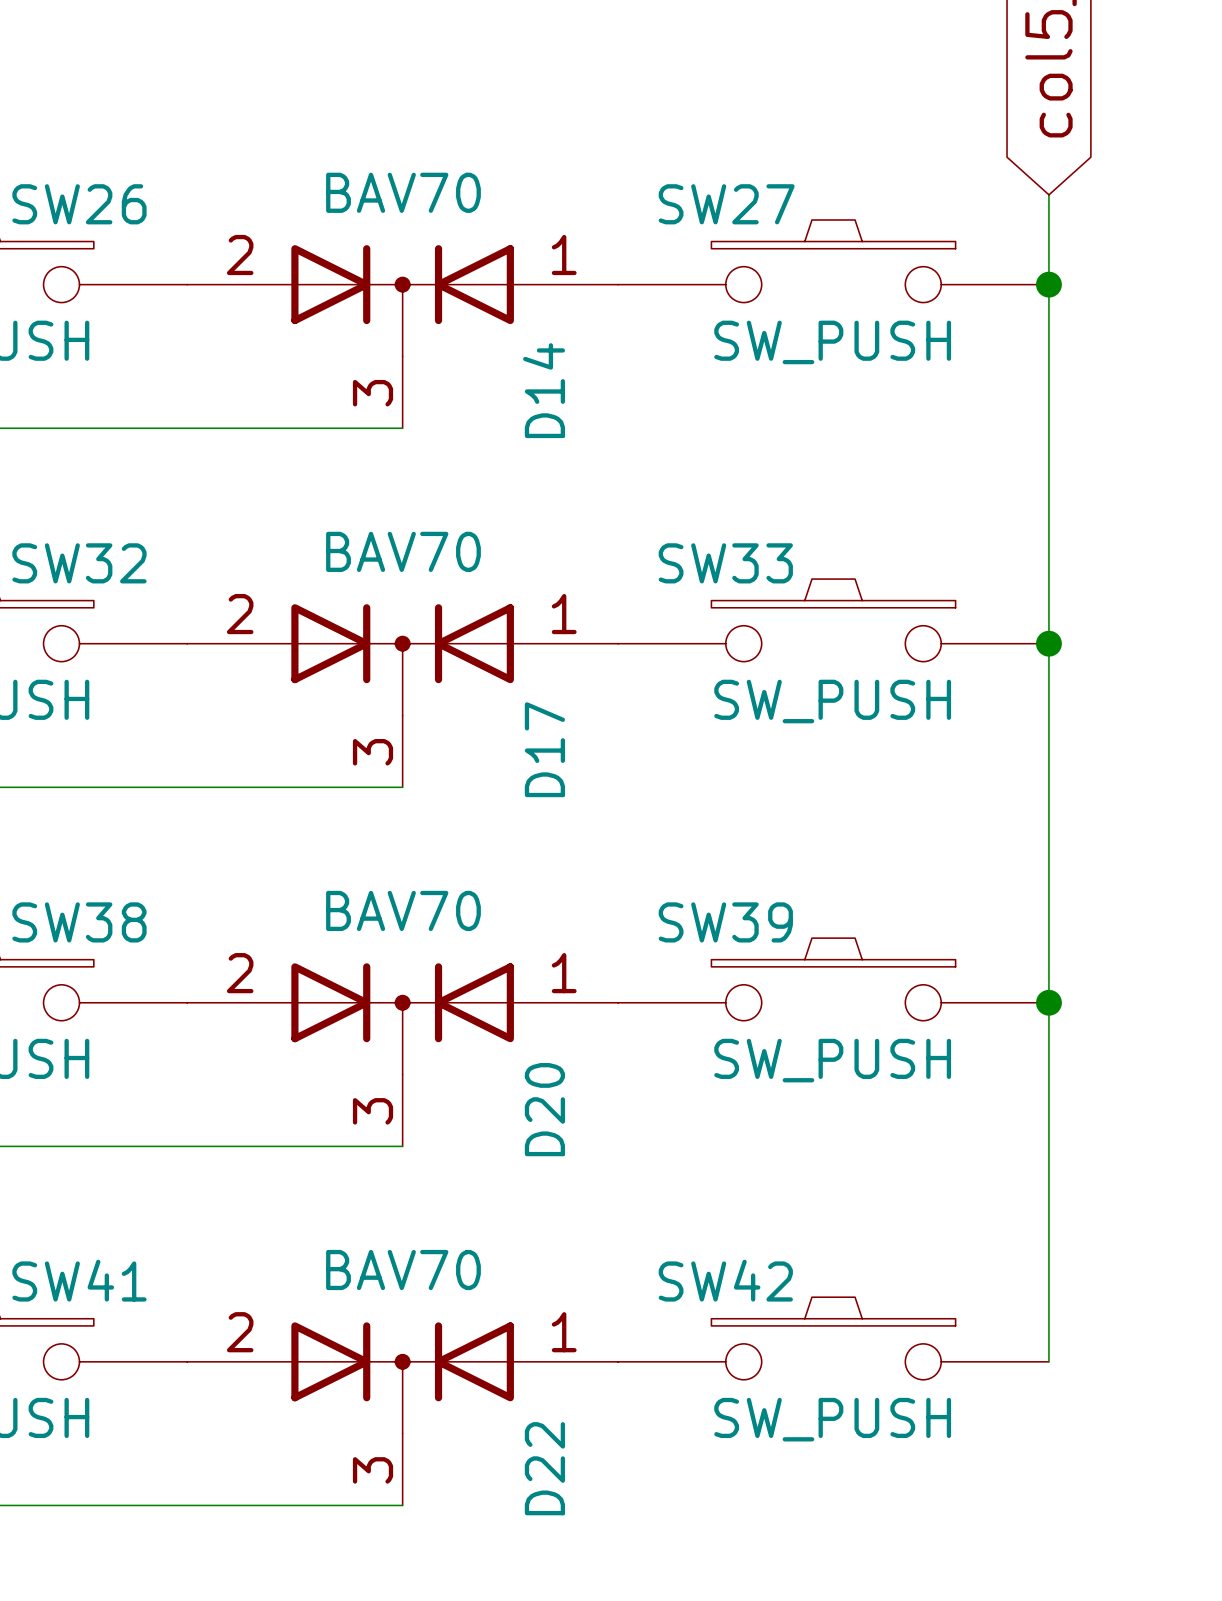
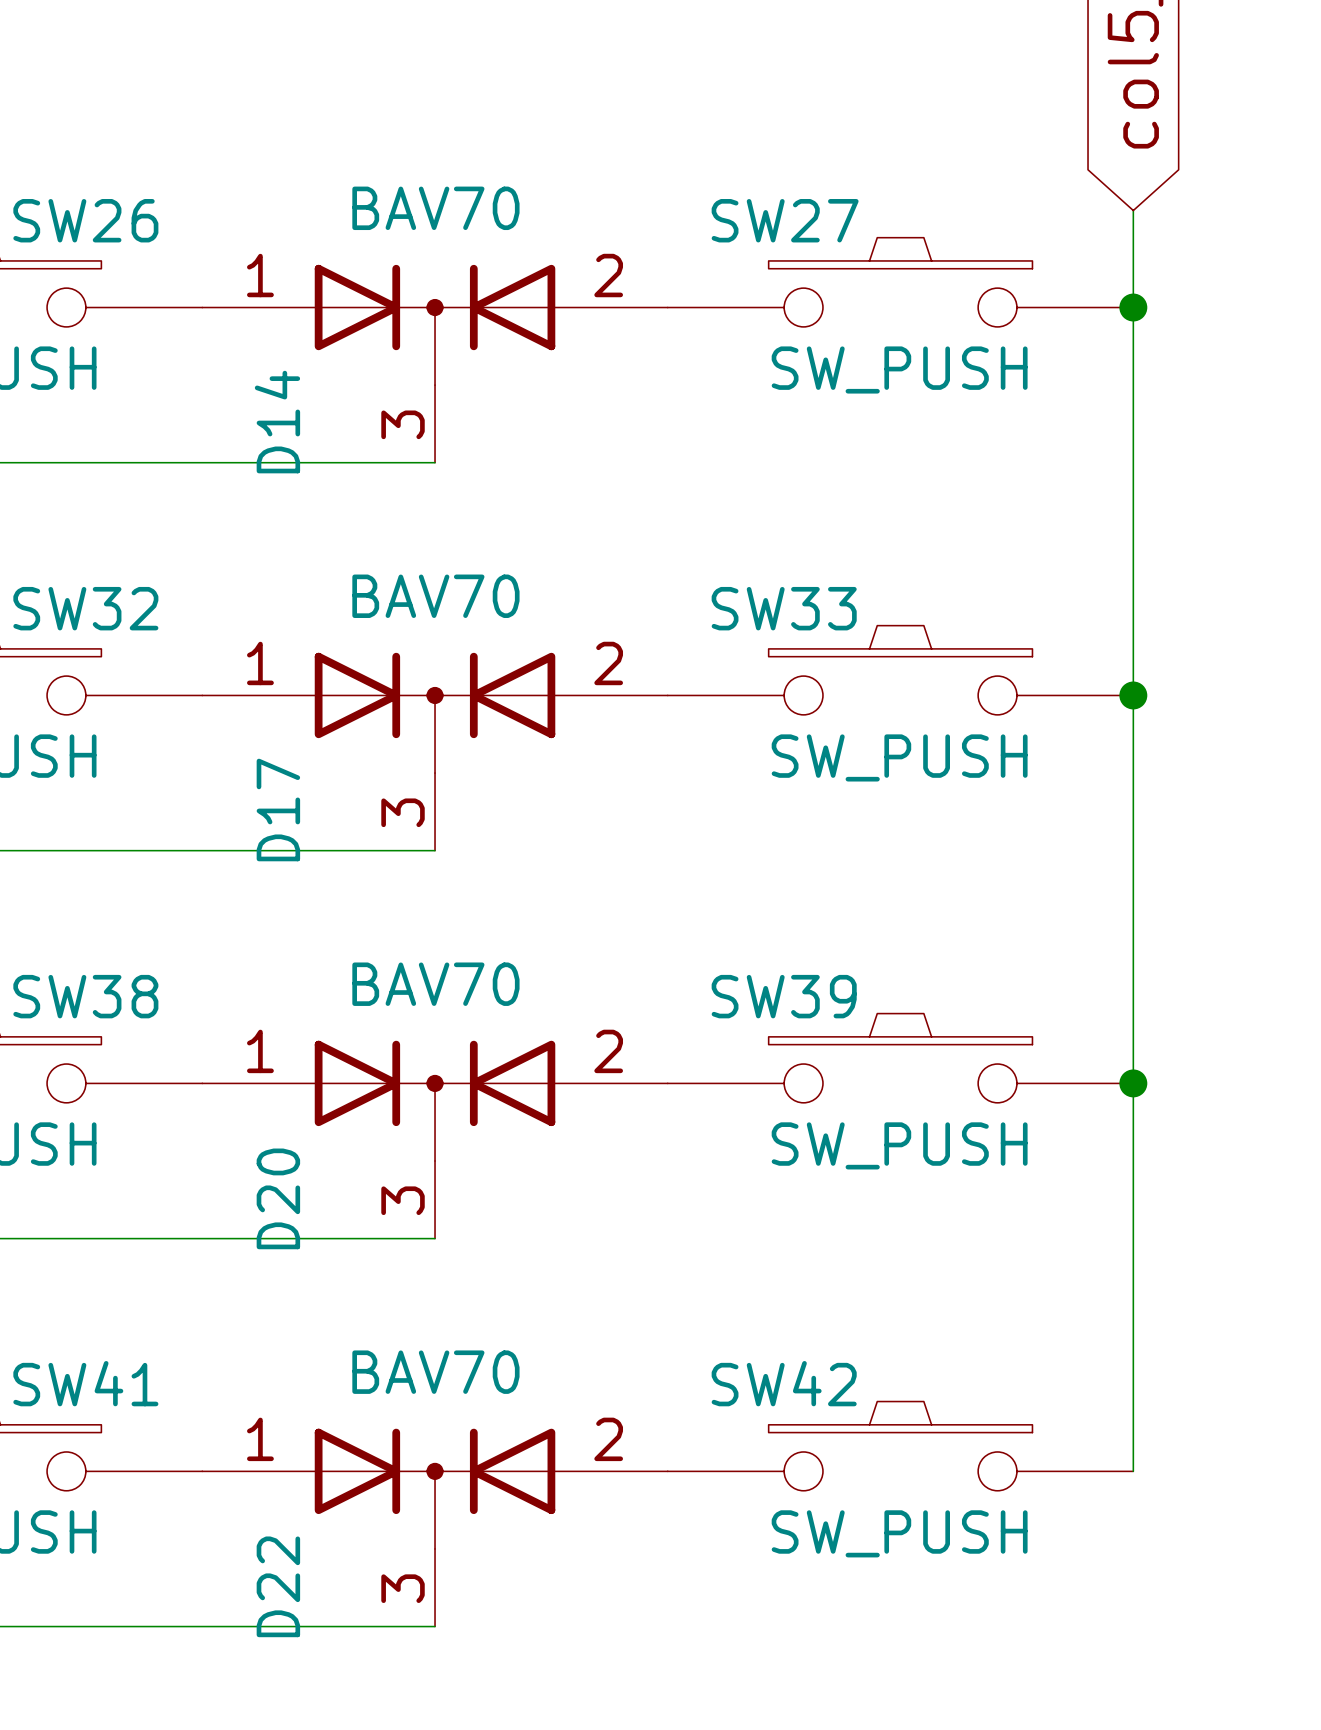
D14 flip: as is (402, 300) -> left-right (435, 324)
D17 flip: as is (402, 659) -> left-right (435, 712)
D20 flip: as is (402, 1018) -> left-right (435, 1100)
D22 flip: as is (402, 1377) -> left-right (435, 1488)

